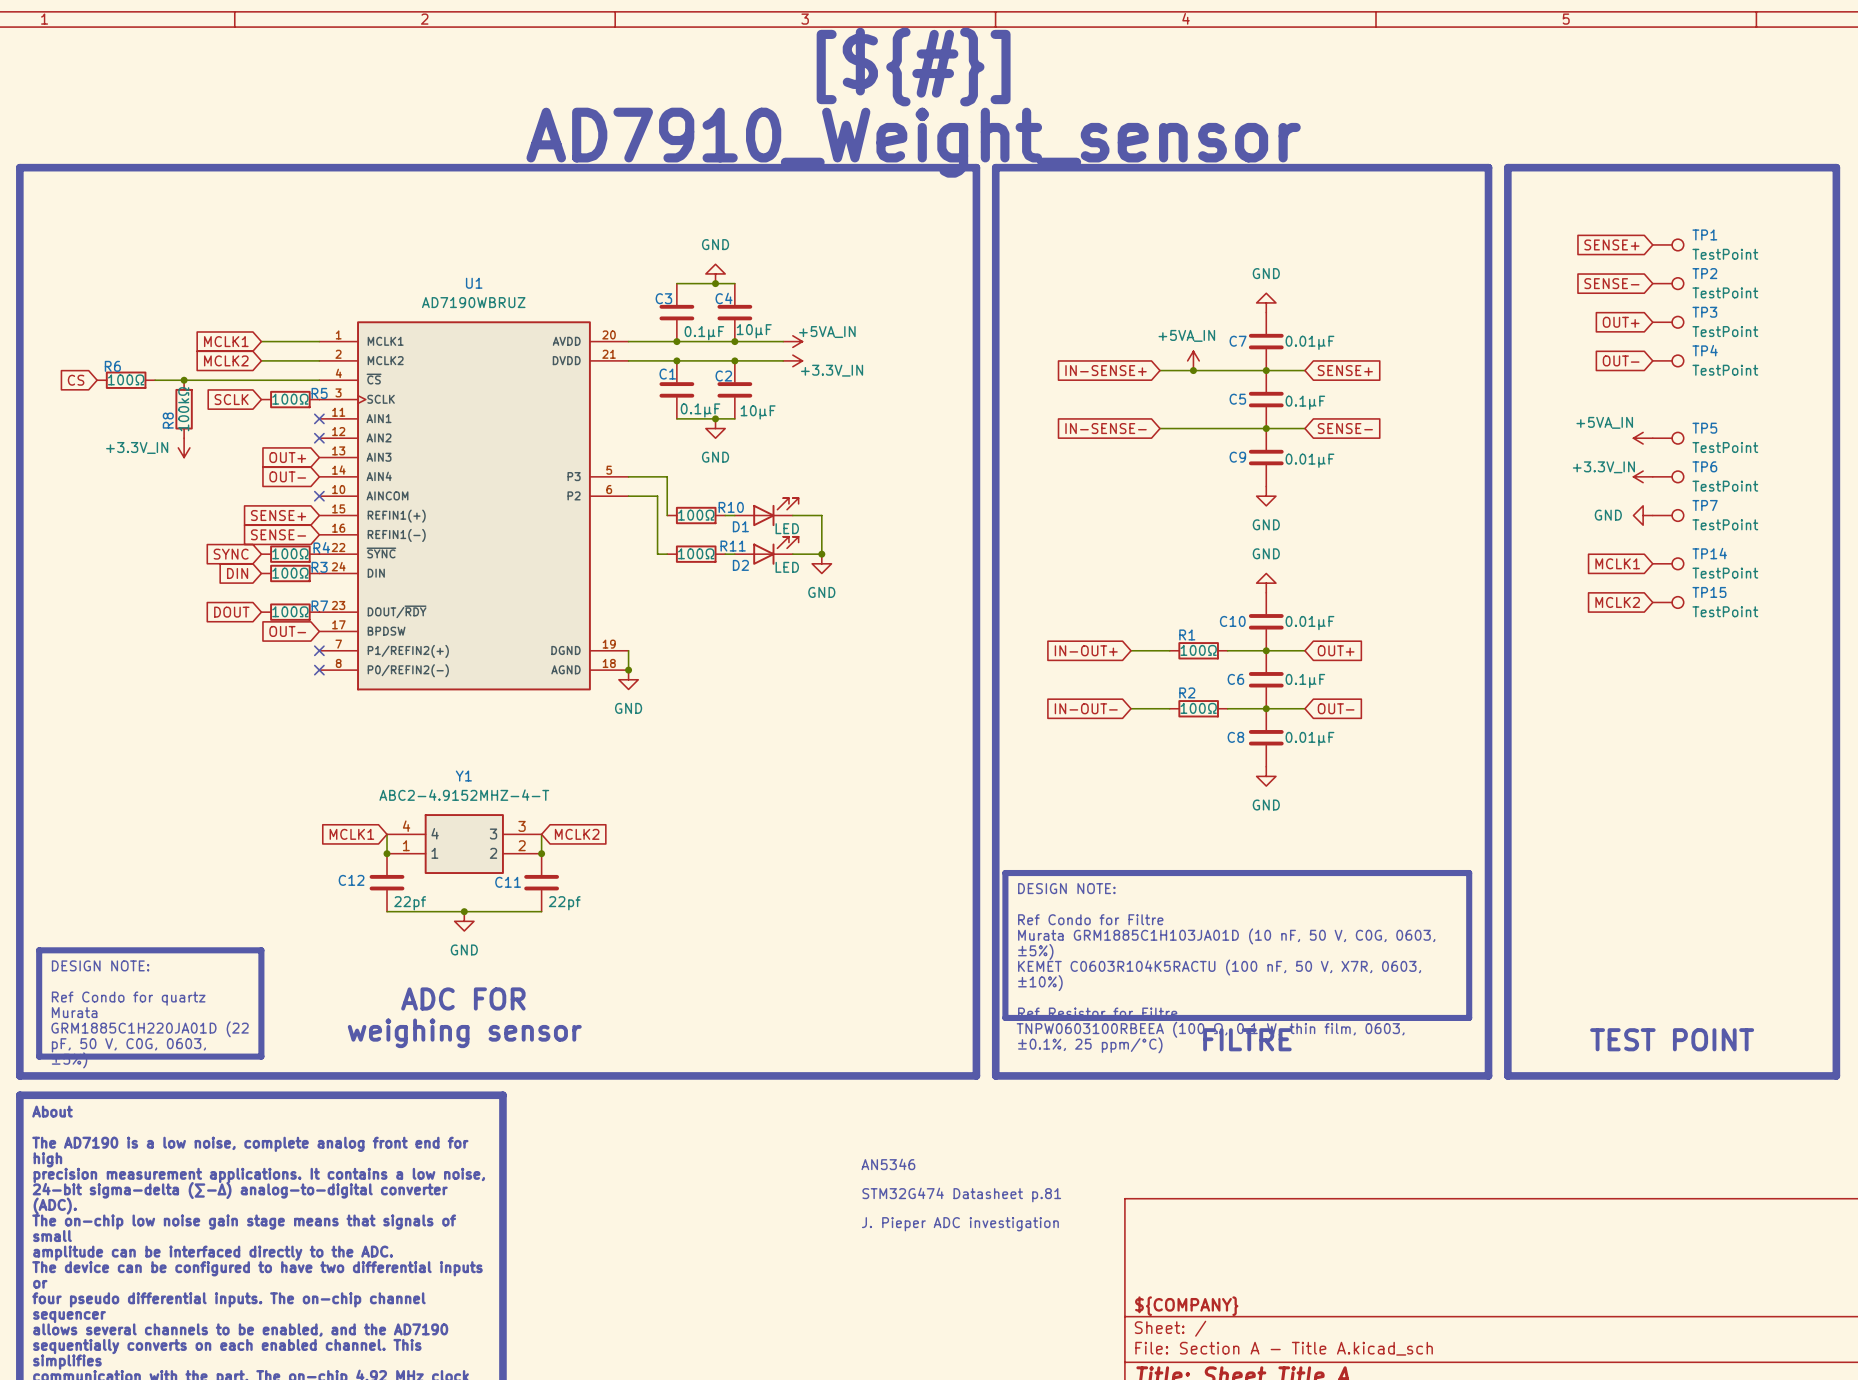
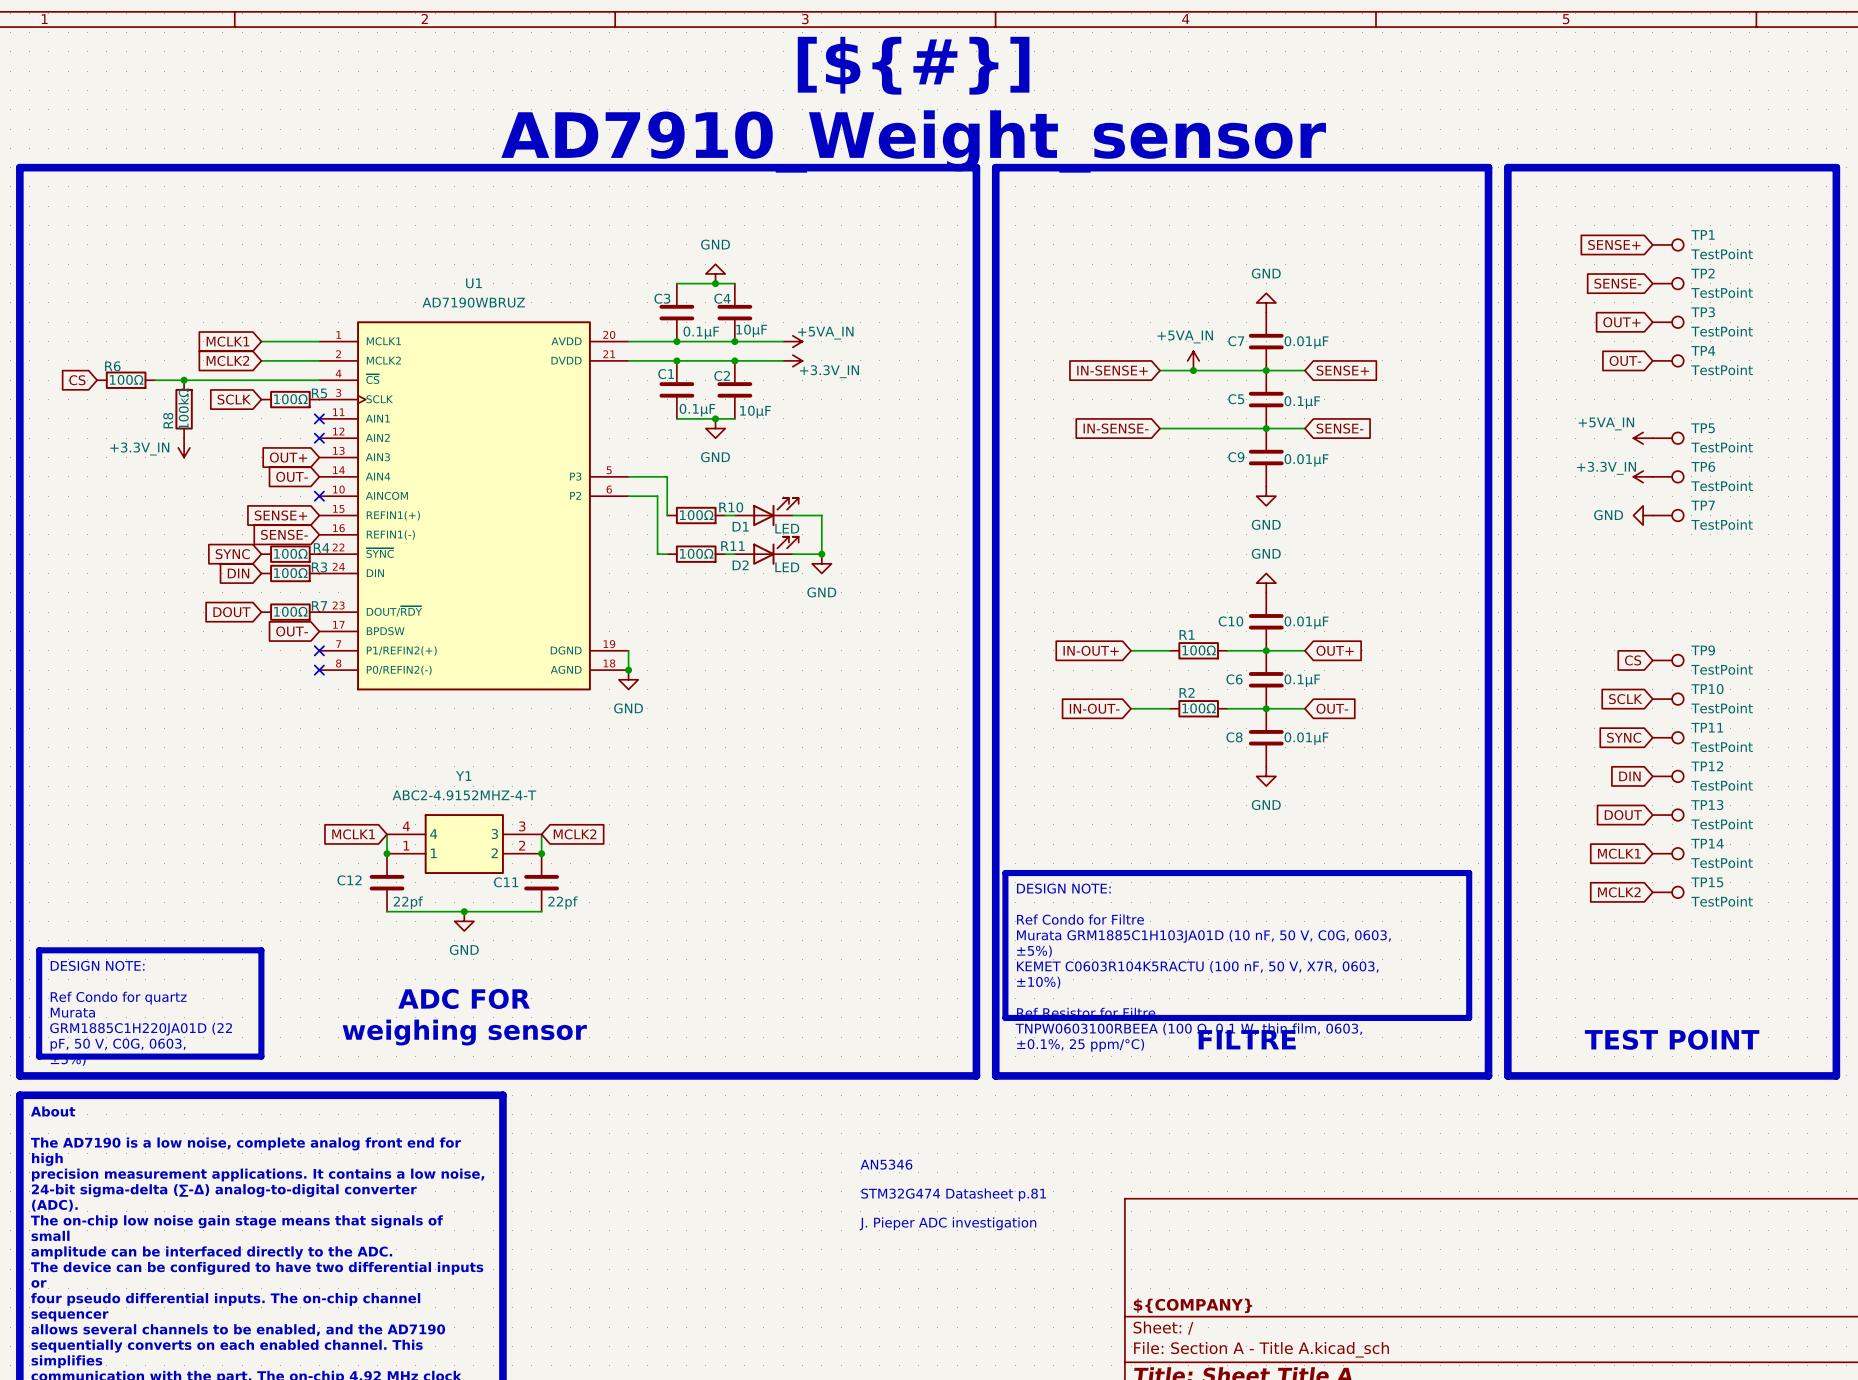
global label: MCLK1 (1617, 563) -> none
TP14 position: (1668, 563) -> (1668, 853)
global label: MCLK2 (1617, 602) -> none
TP15 position: (1668, 602) -> (1668, 892)
global label: none -> CS (1633, 660)
TP9: none -> TestPoint (1668, 660)
global label: none -> SCLK (1625, 699)
TP10: none -> TestPoint (1668, 699)
global label: none -> SYNC (1624, 737)
TP11: none -> TestPoint (1668, 737)
global label: none -> DIN (1629, 776)
TP12: none -> TestPoint (1668, 776)
global label: none -> DOUT (1623, 815)
TP13: none -> TestPoint (1668, 815)
global label: none -> MCLK1 (1619, 853)
global label: none -> MCLK2 (1619, 892)

